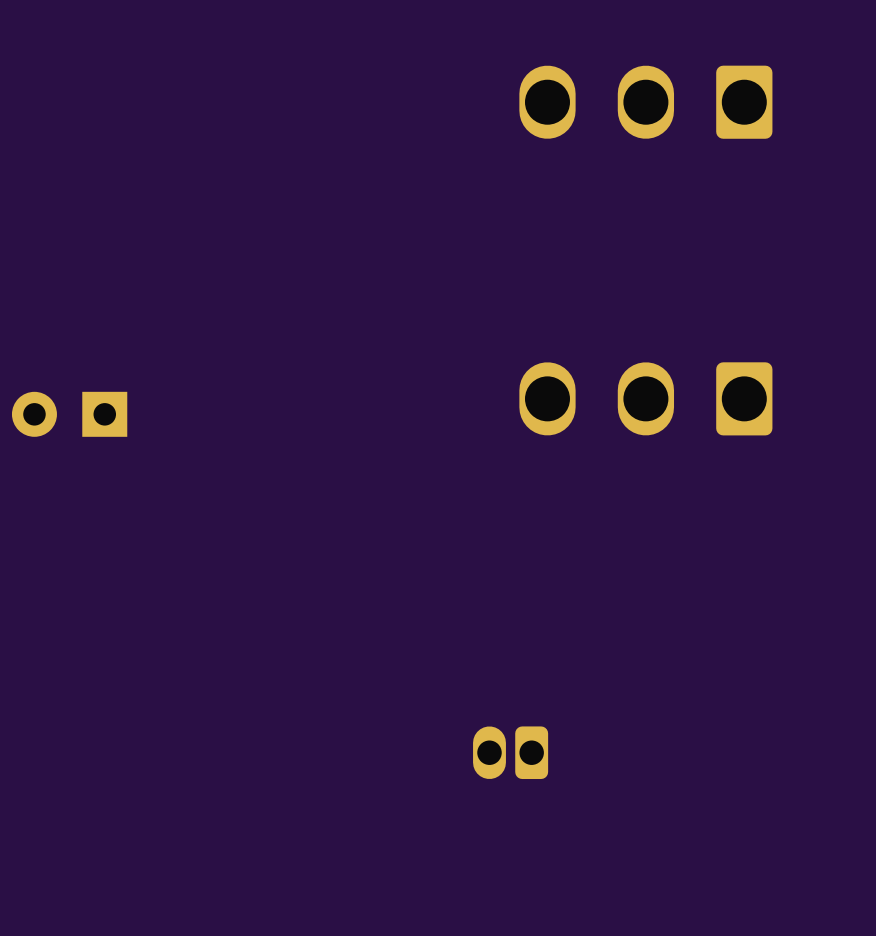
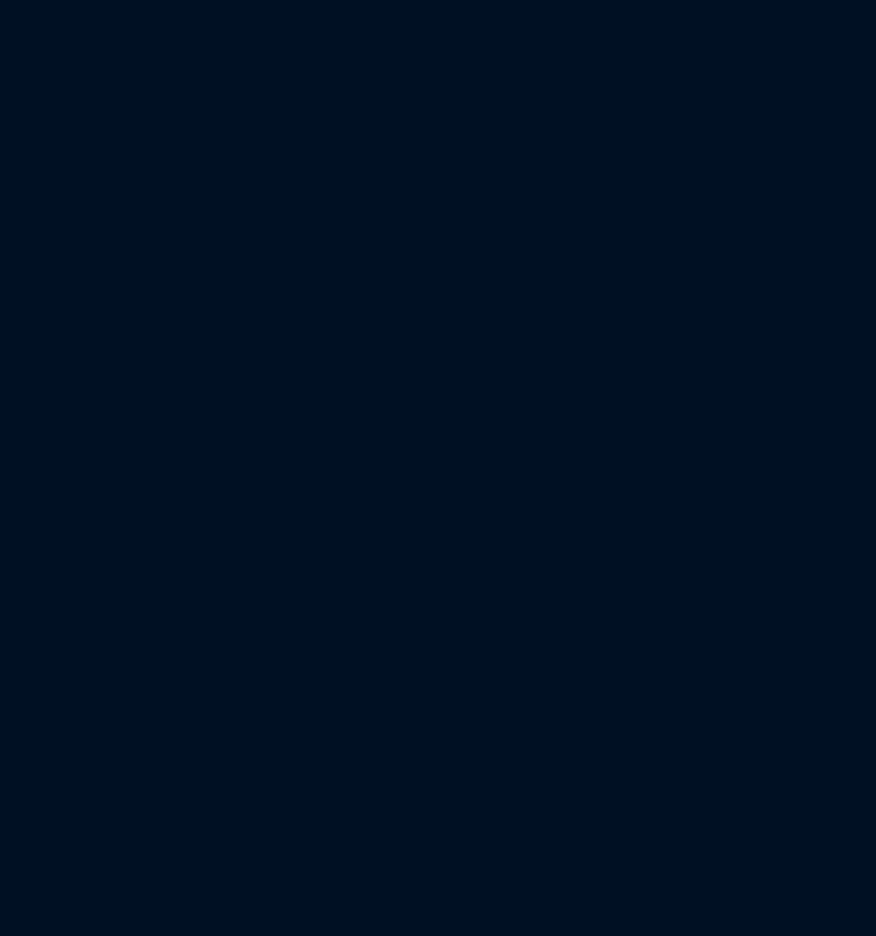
part: (645, 102) -> none
part: (645, 398) -> none
part: (69, 414) -> none
part: (510, 752) -> none

